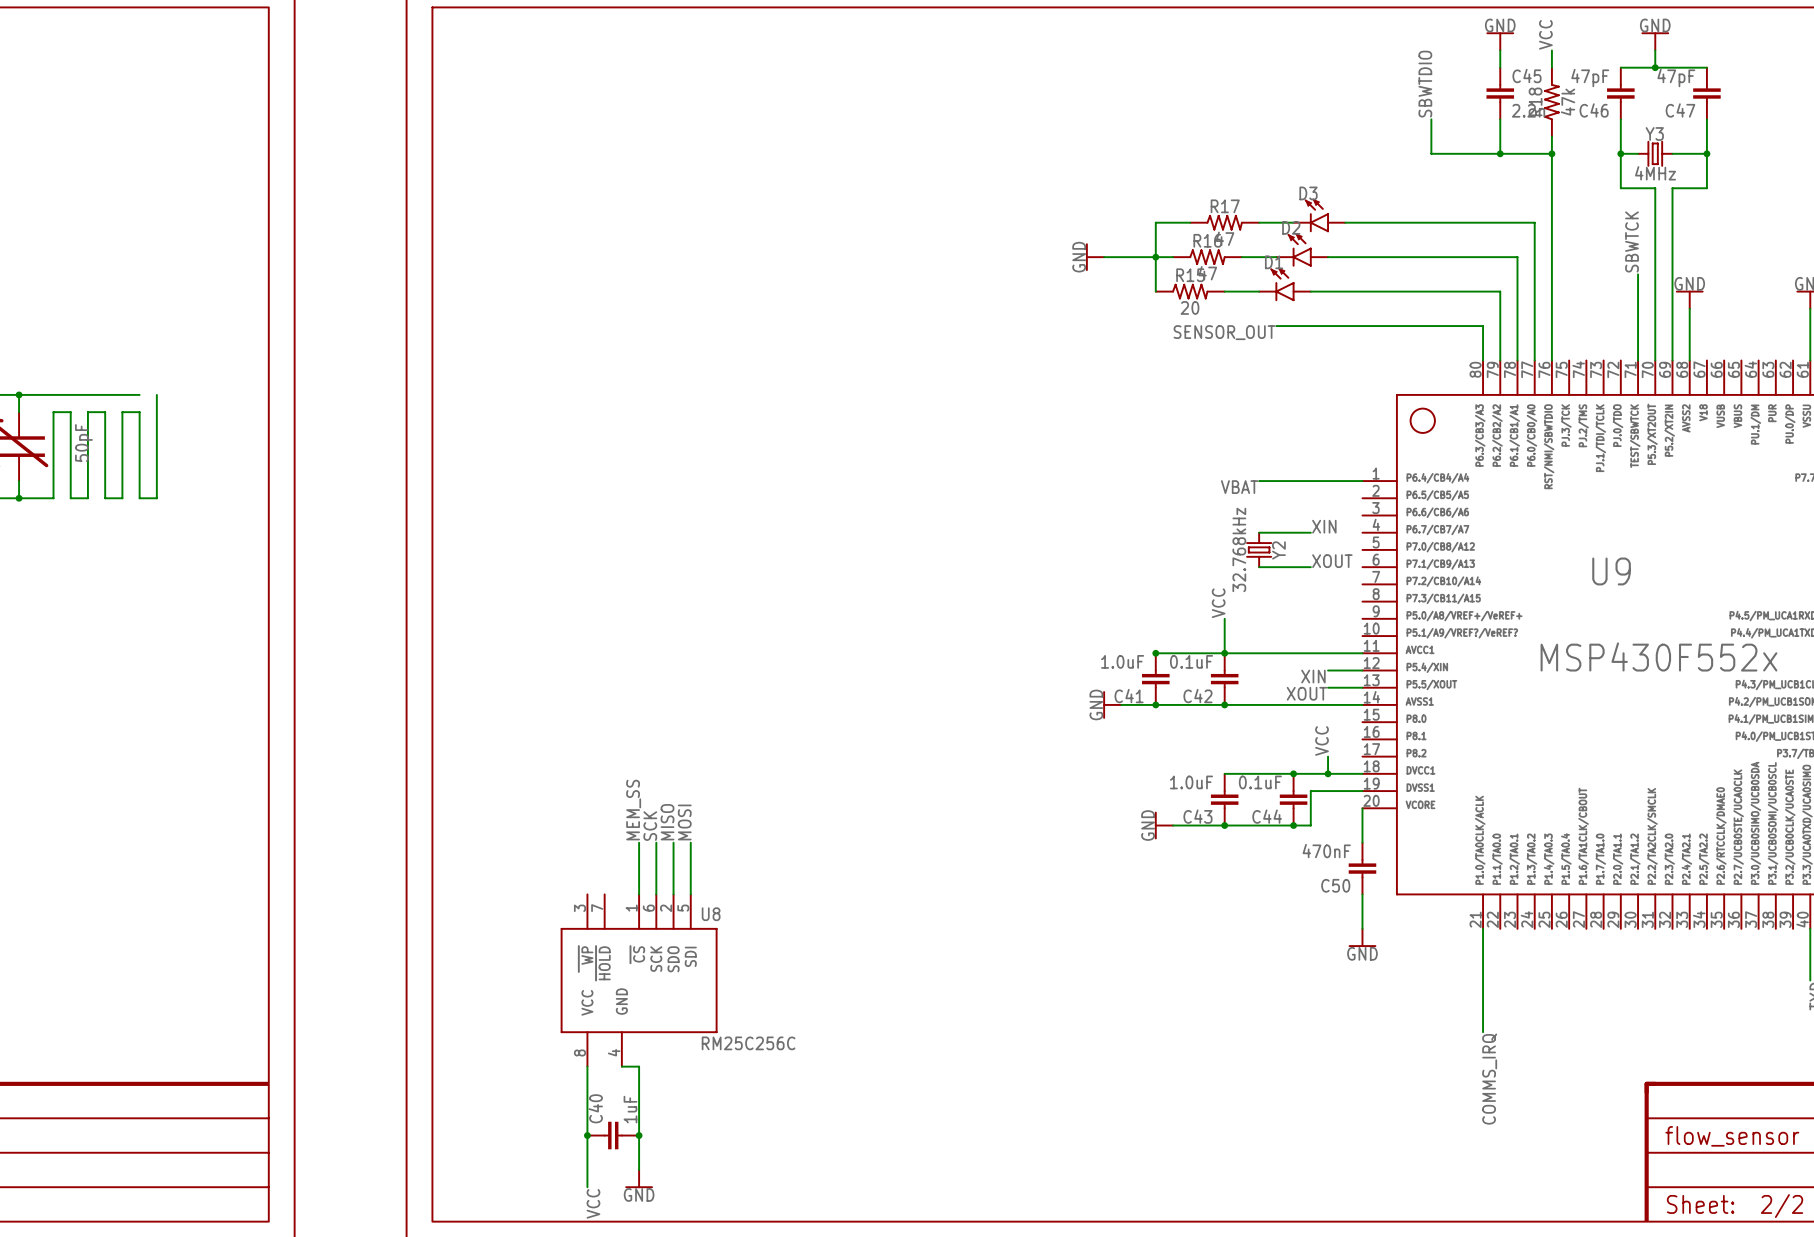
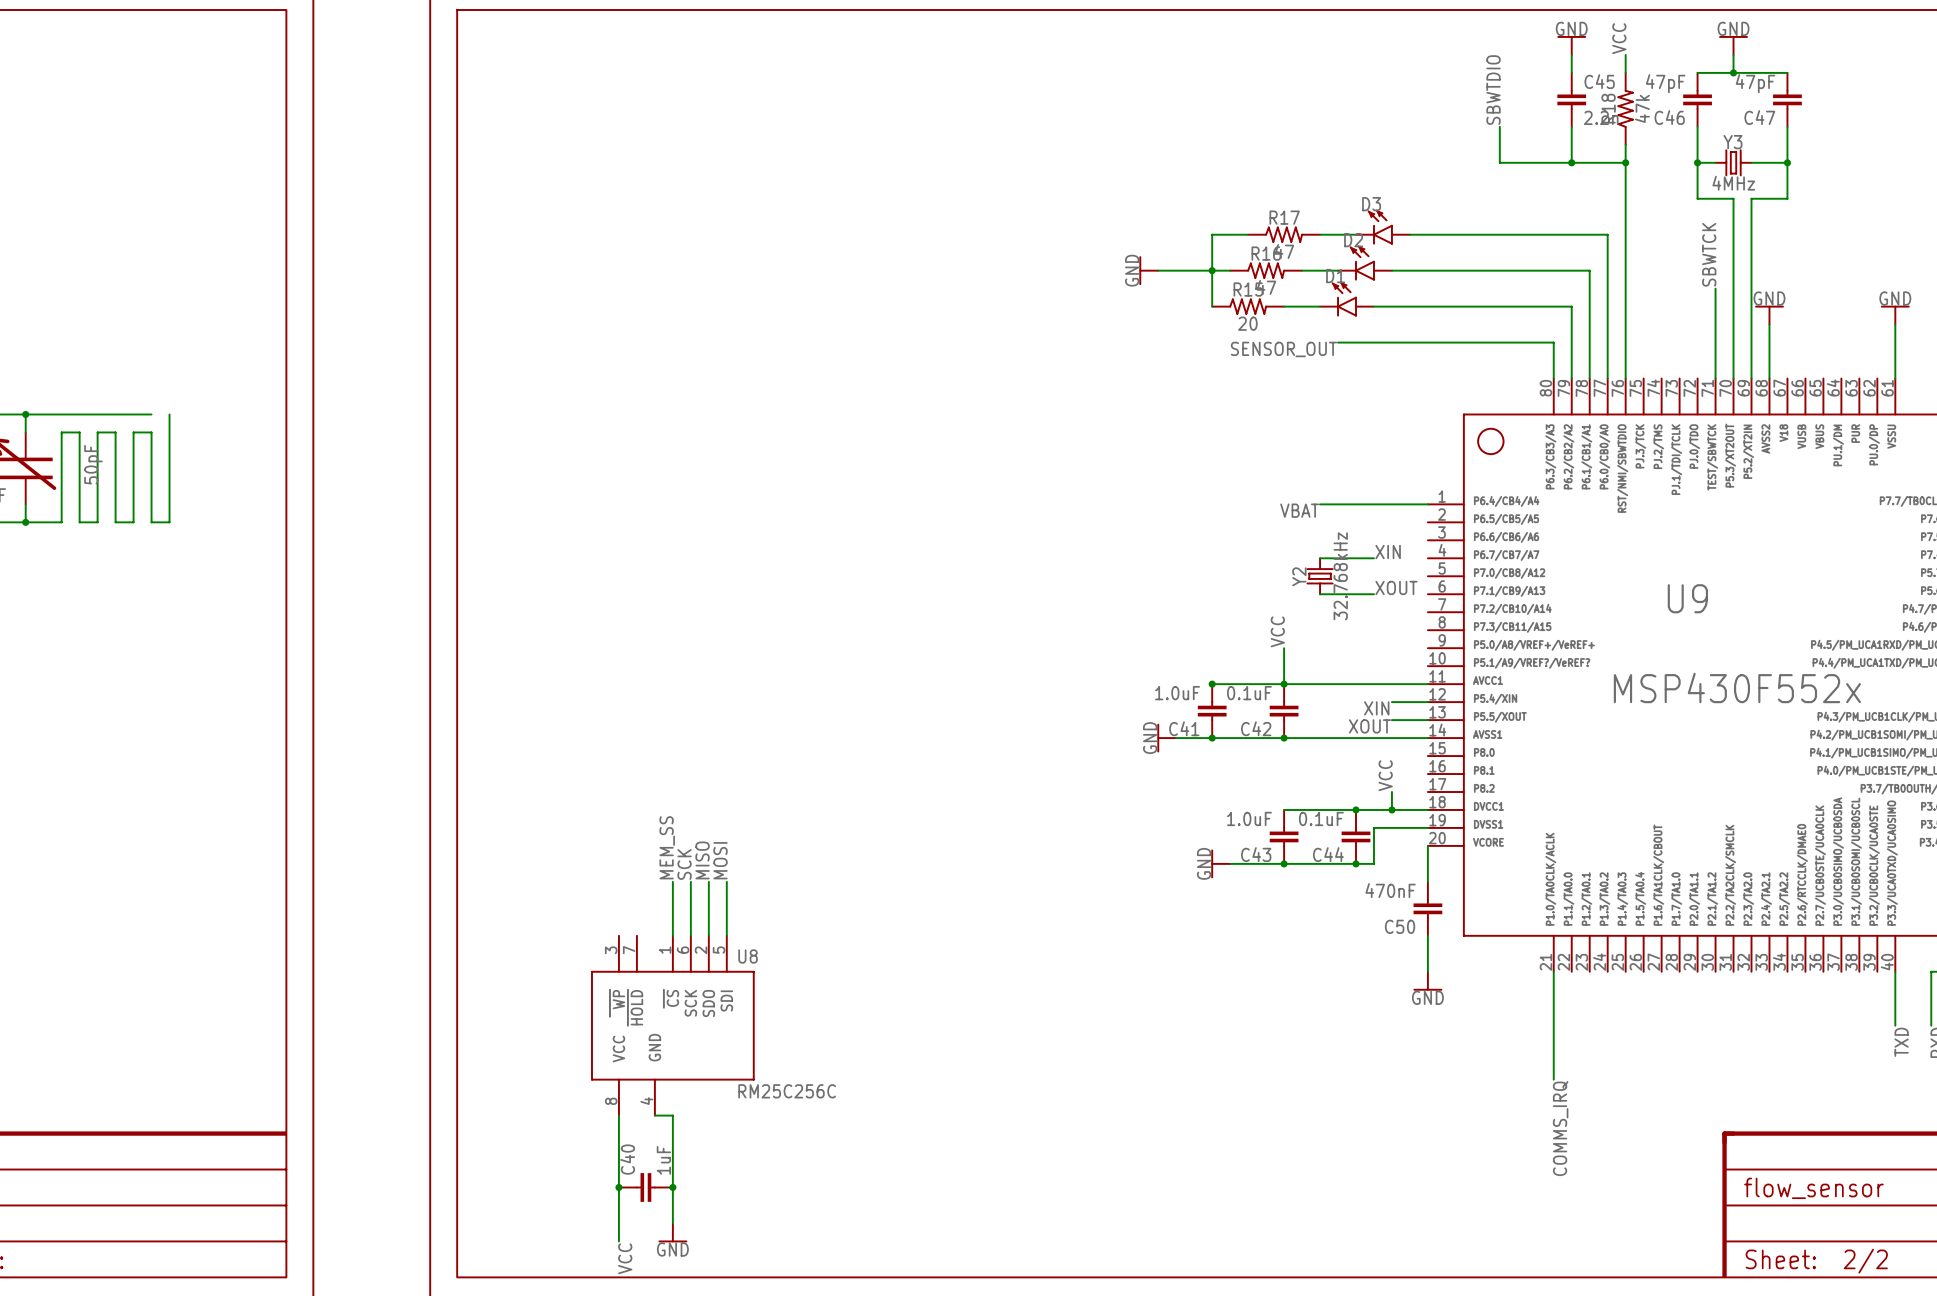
Y2 value position: 32.768kHz (1239, 549) -> 32.768kHz (1340, 576)
Y2 name position: Y2 (1278, 550) -> Y2 (1299, 576)

